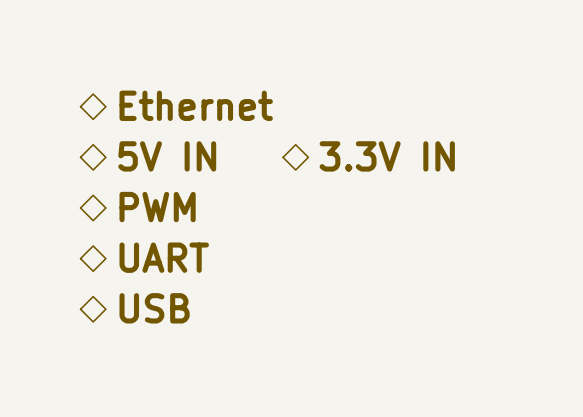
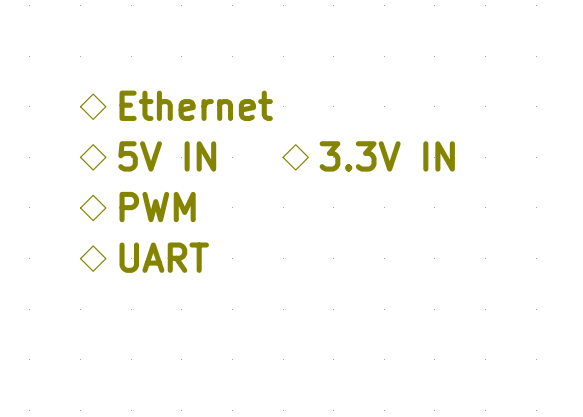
hierarchical label: USB (154, 308) -> none

